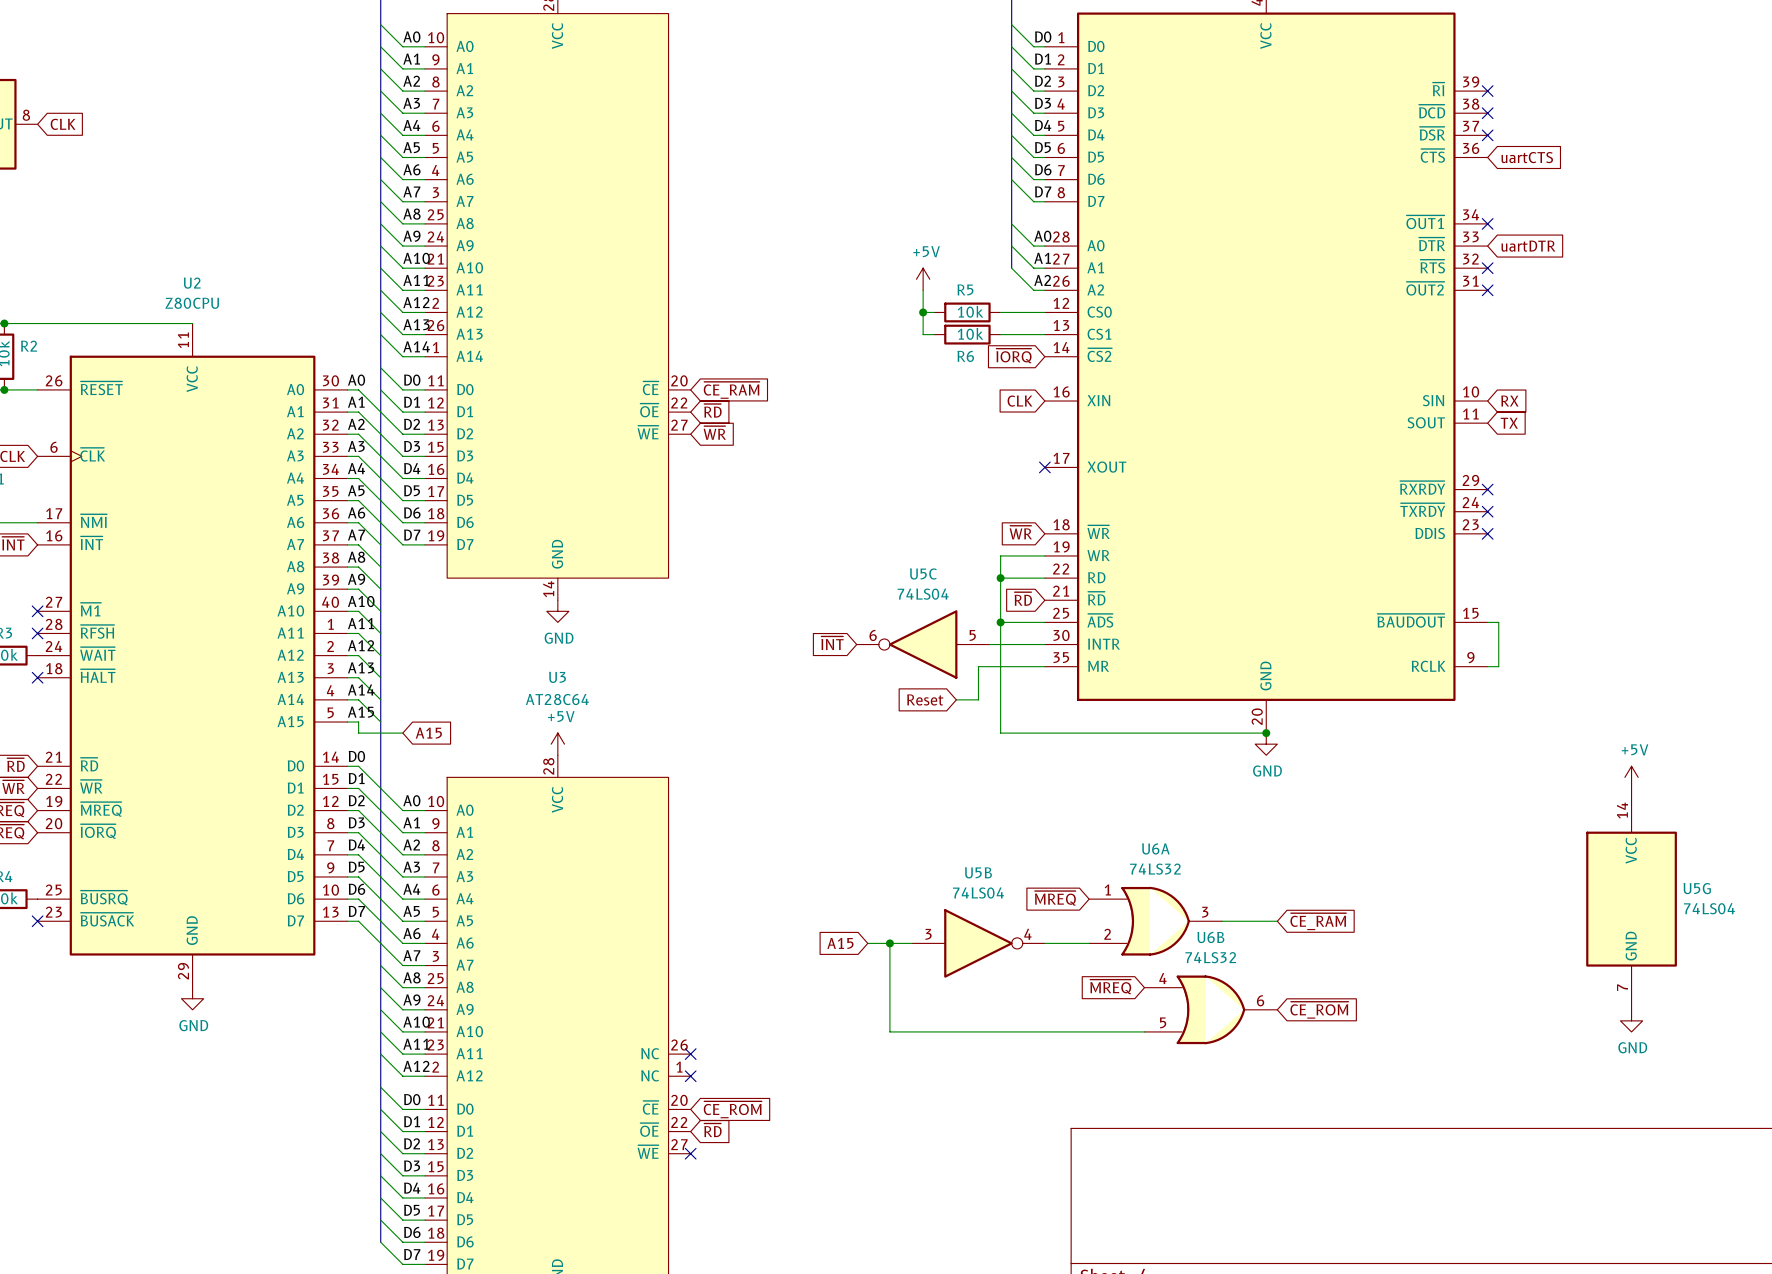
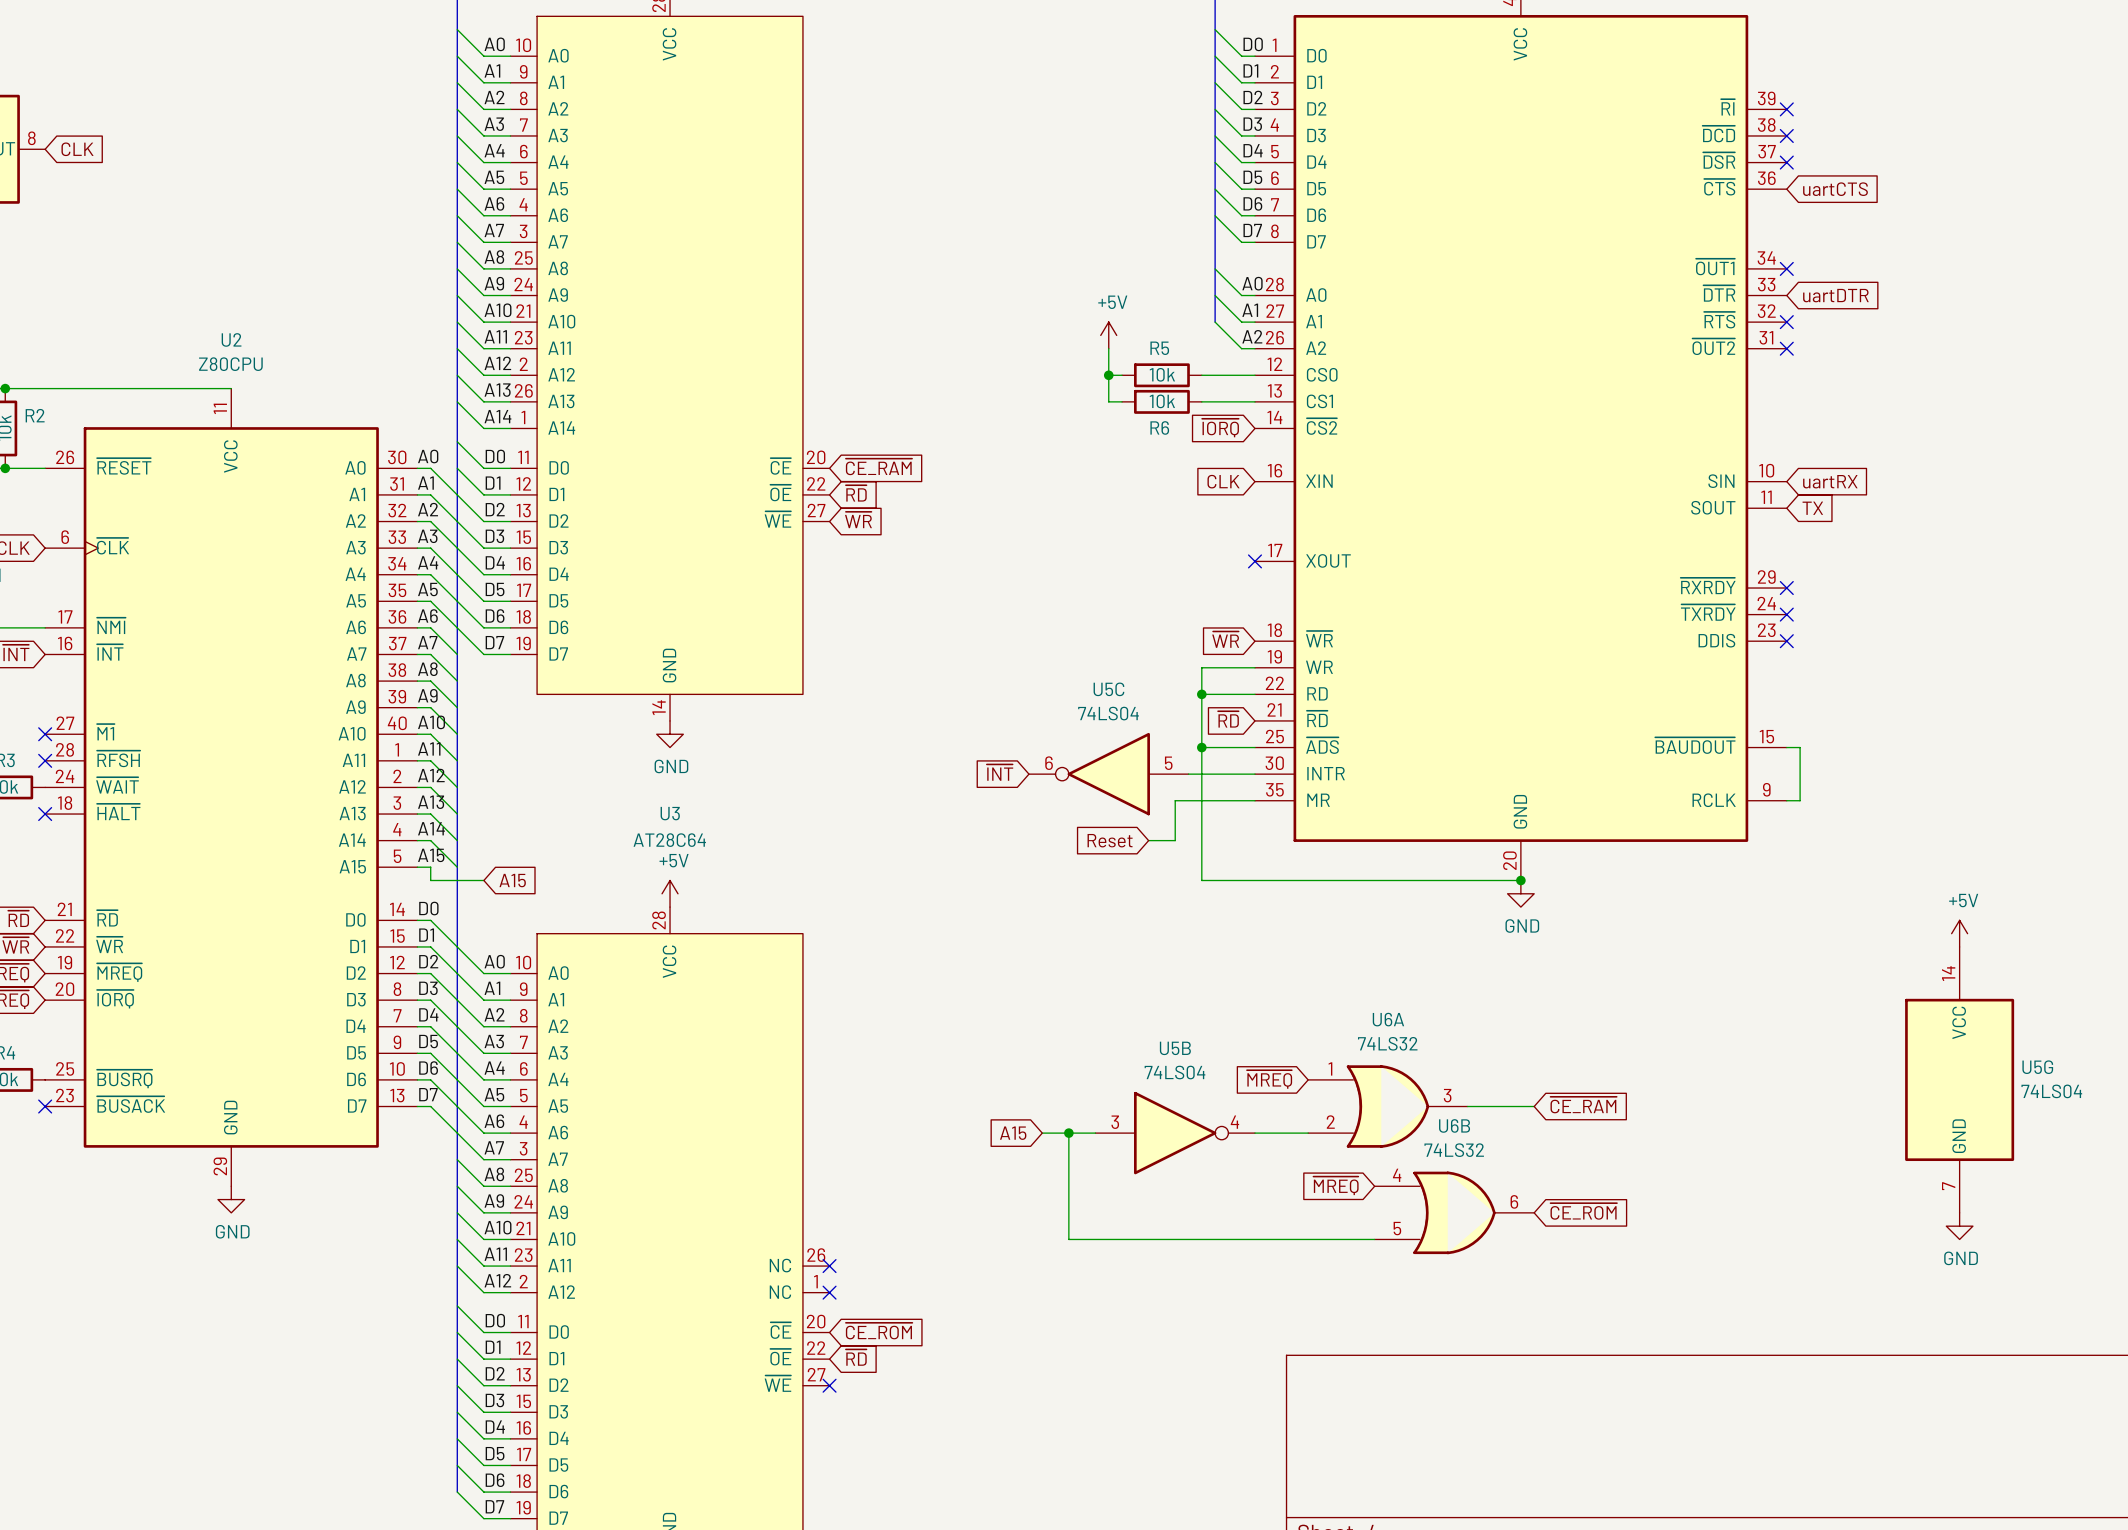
global label: RX (1509, 401) -> uartRX (1830, 481)

